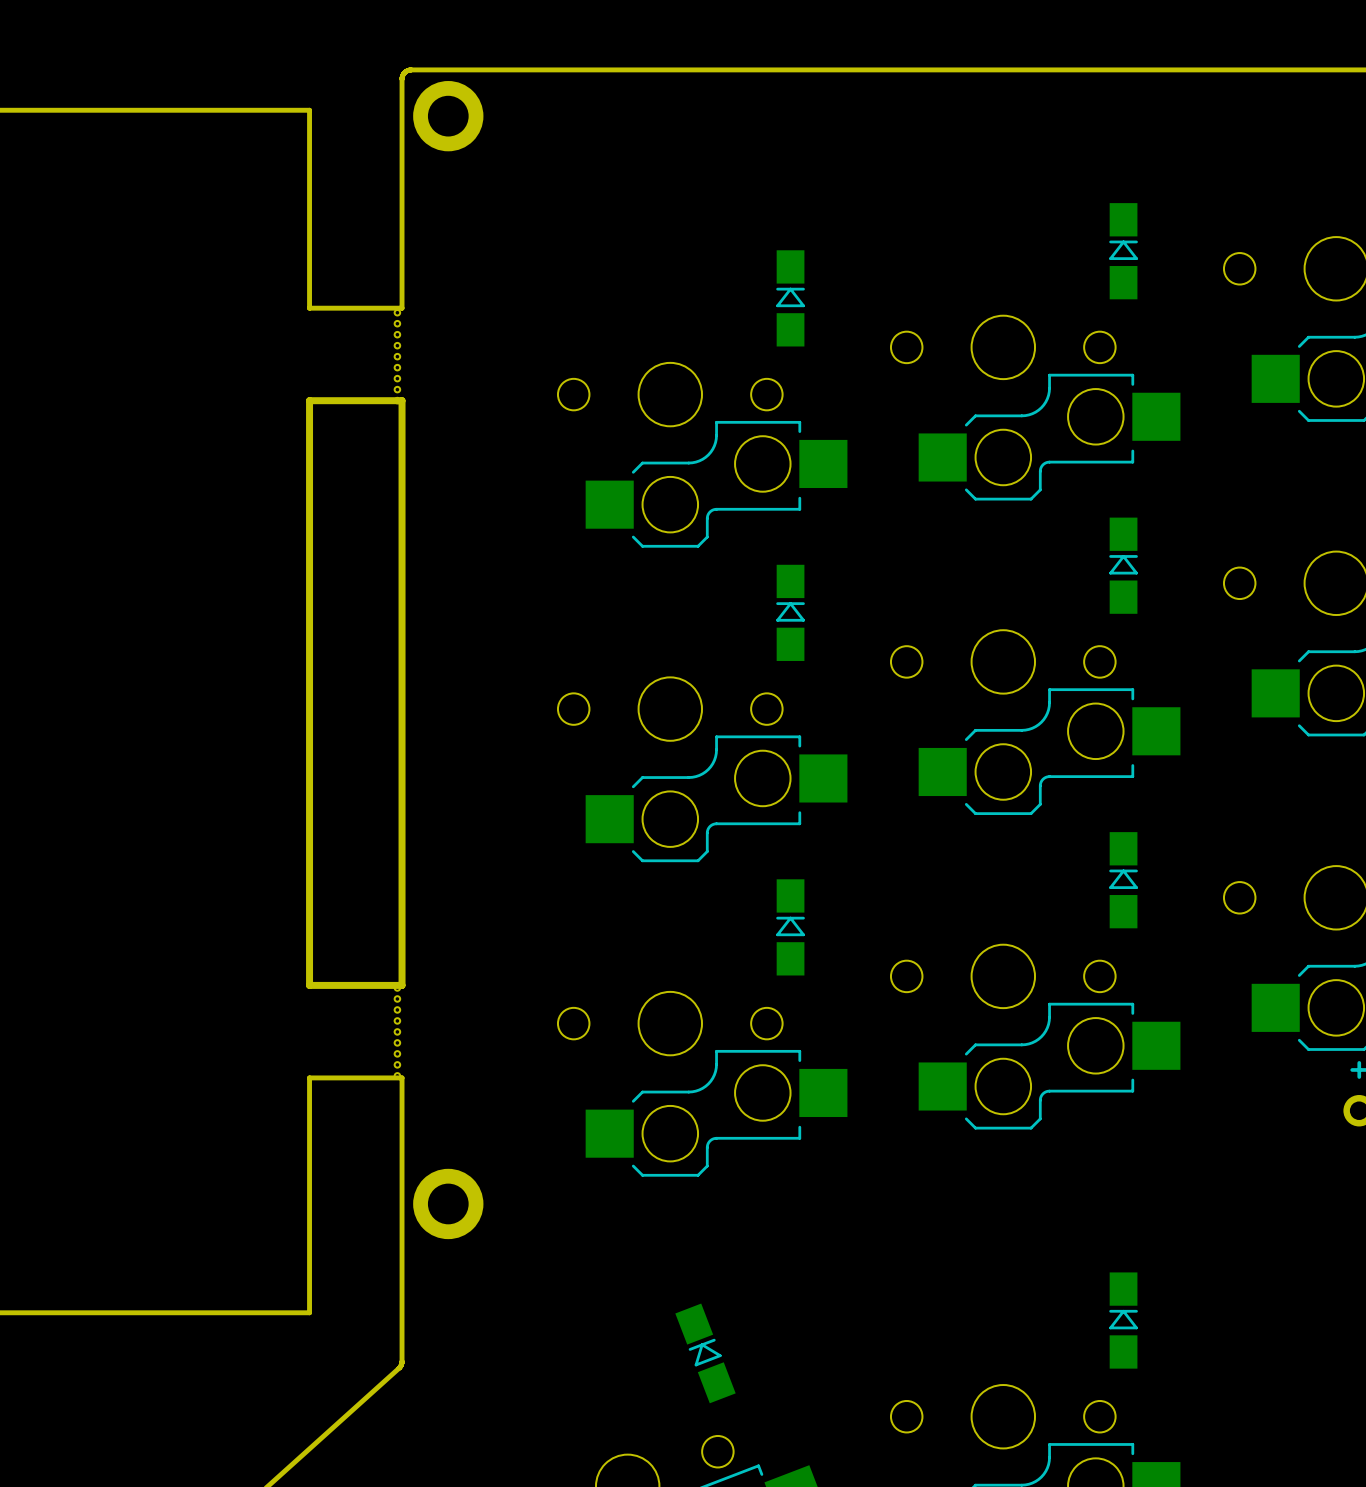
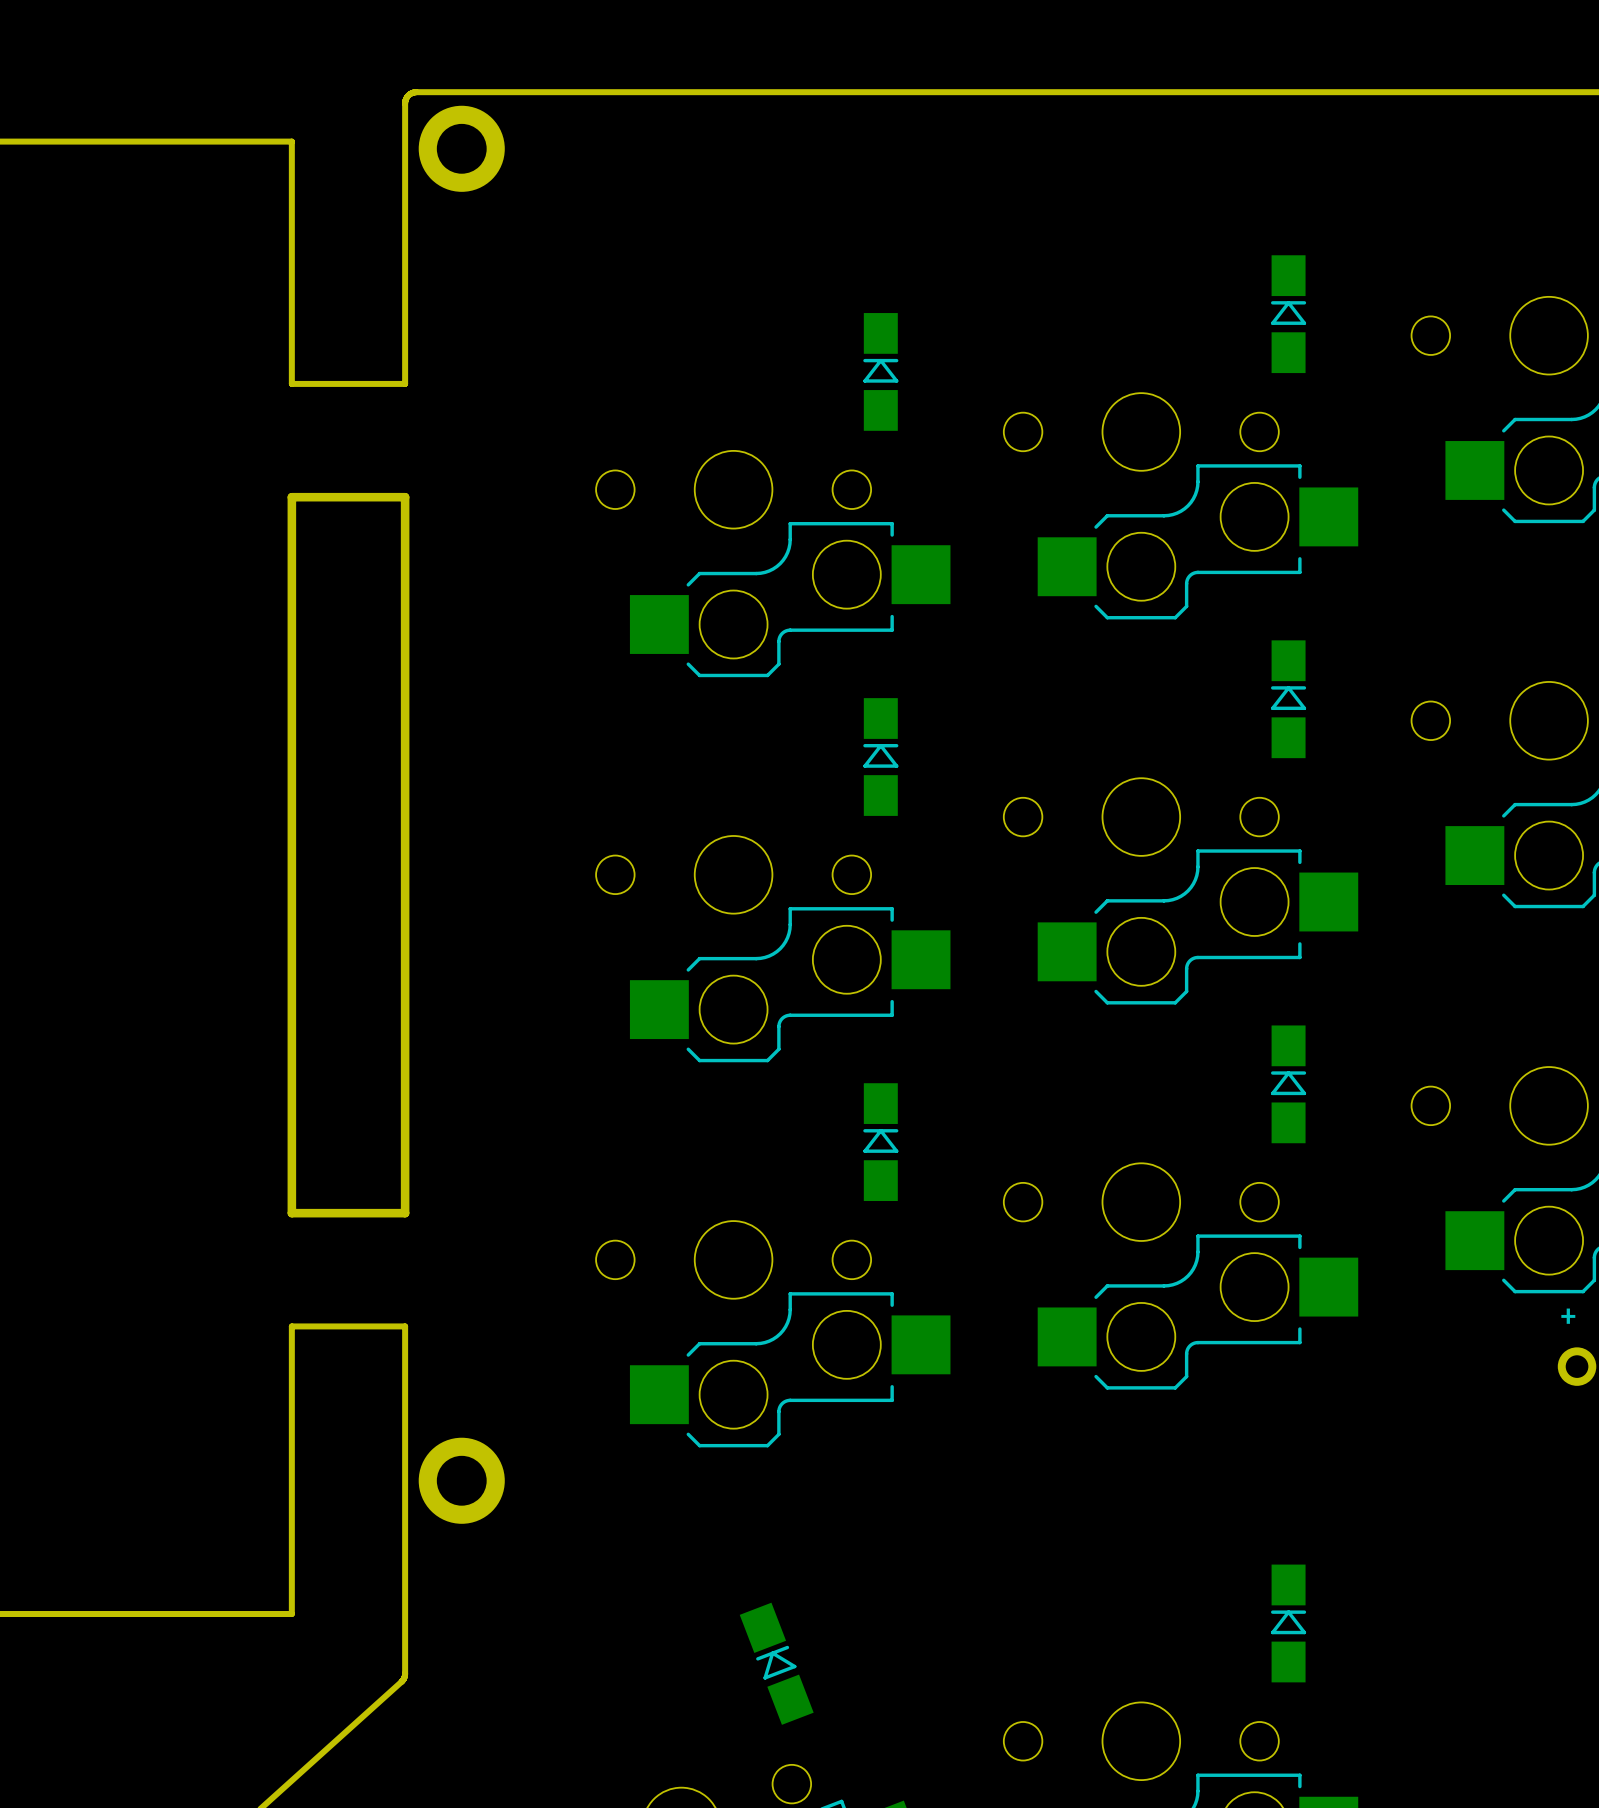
part: (397, 356) -> none
part: (397, 1031) -> none

